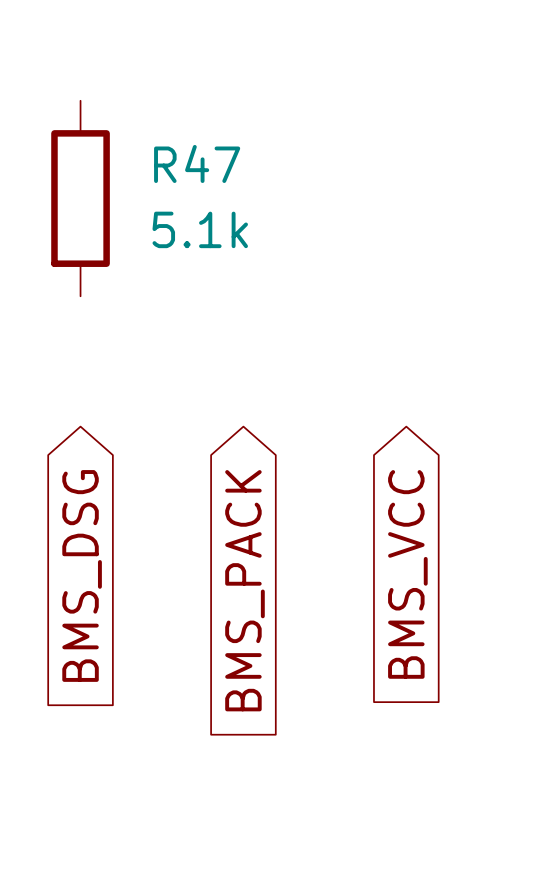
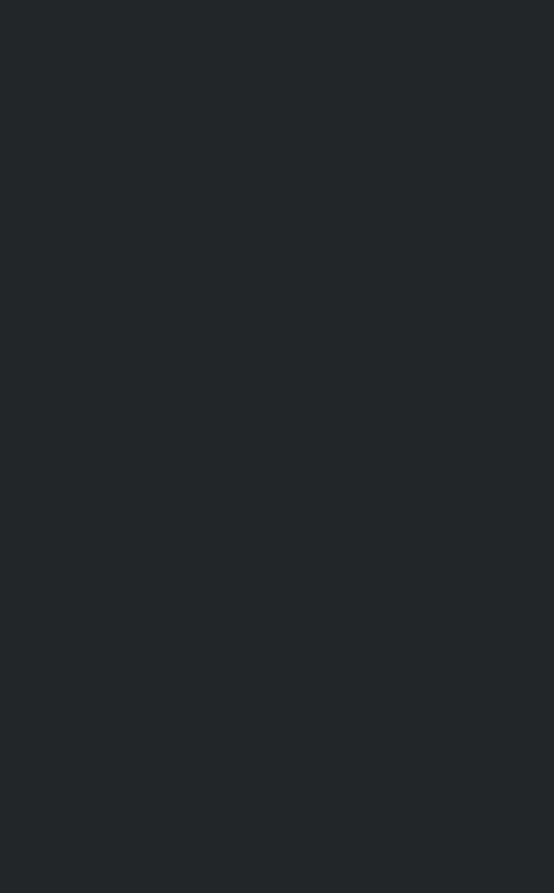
R47: 5.1k (80, 198) -> none
global label: BMS_VCC (407, 574) -> none
global label: BMS_DSG (82, 575) -> none
global label: BMS_PACK (244, 590) -> none

